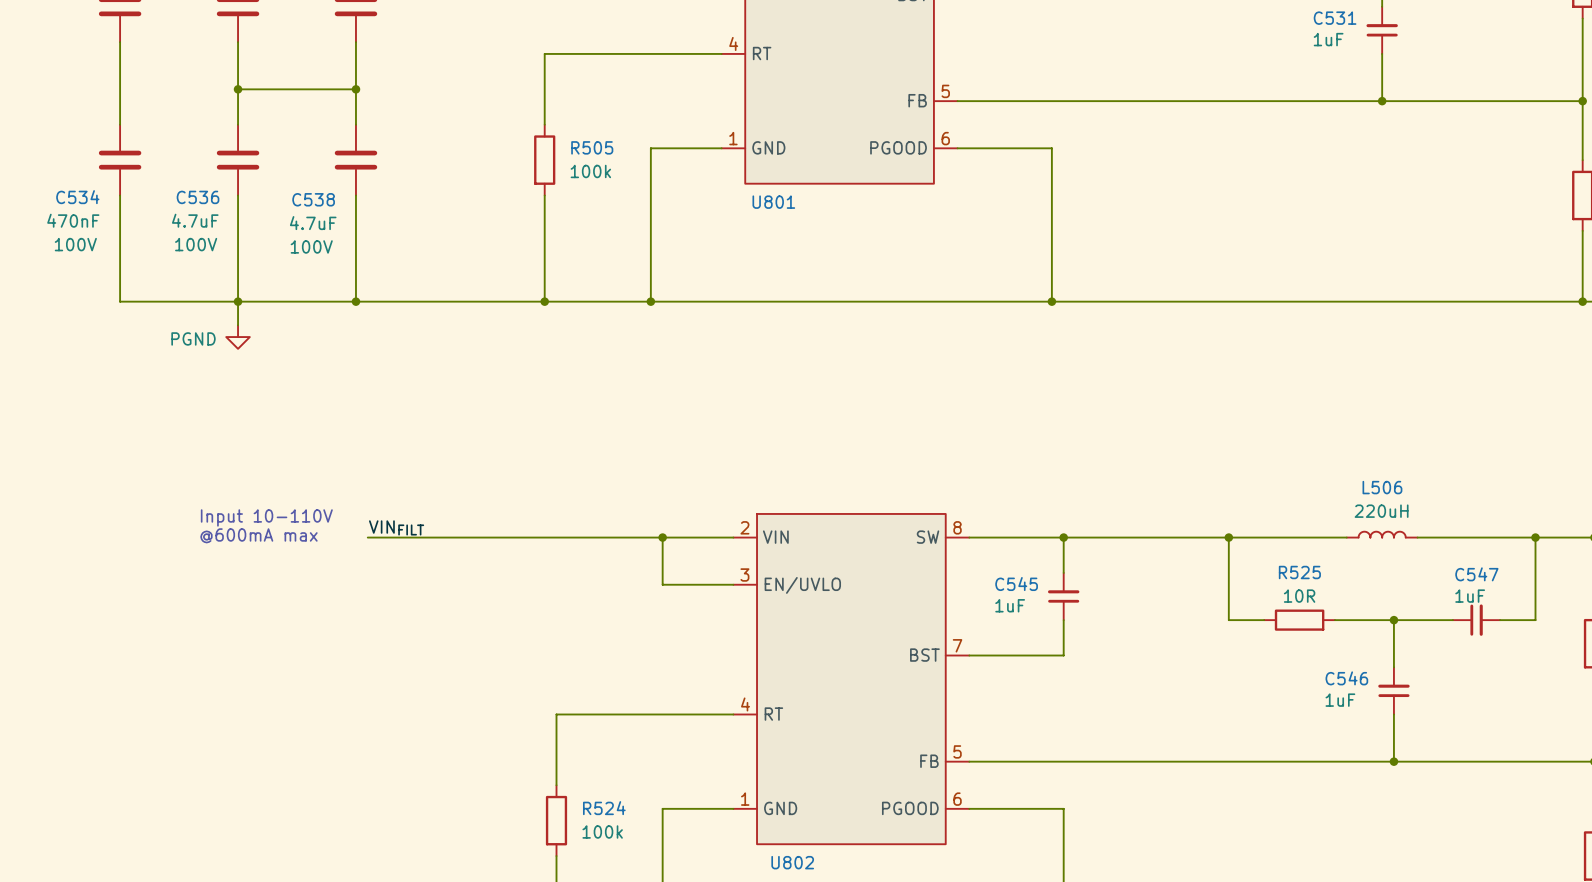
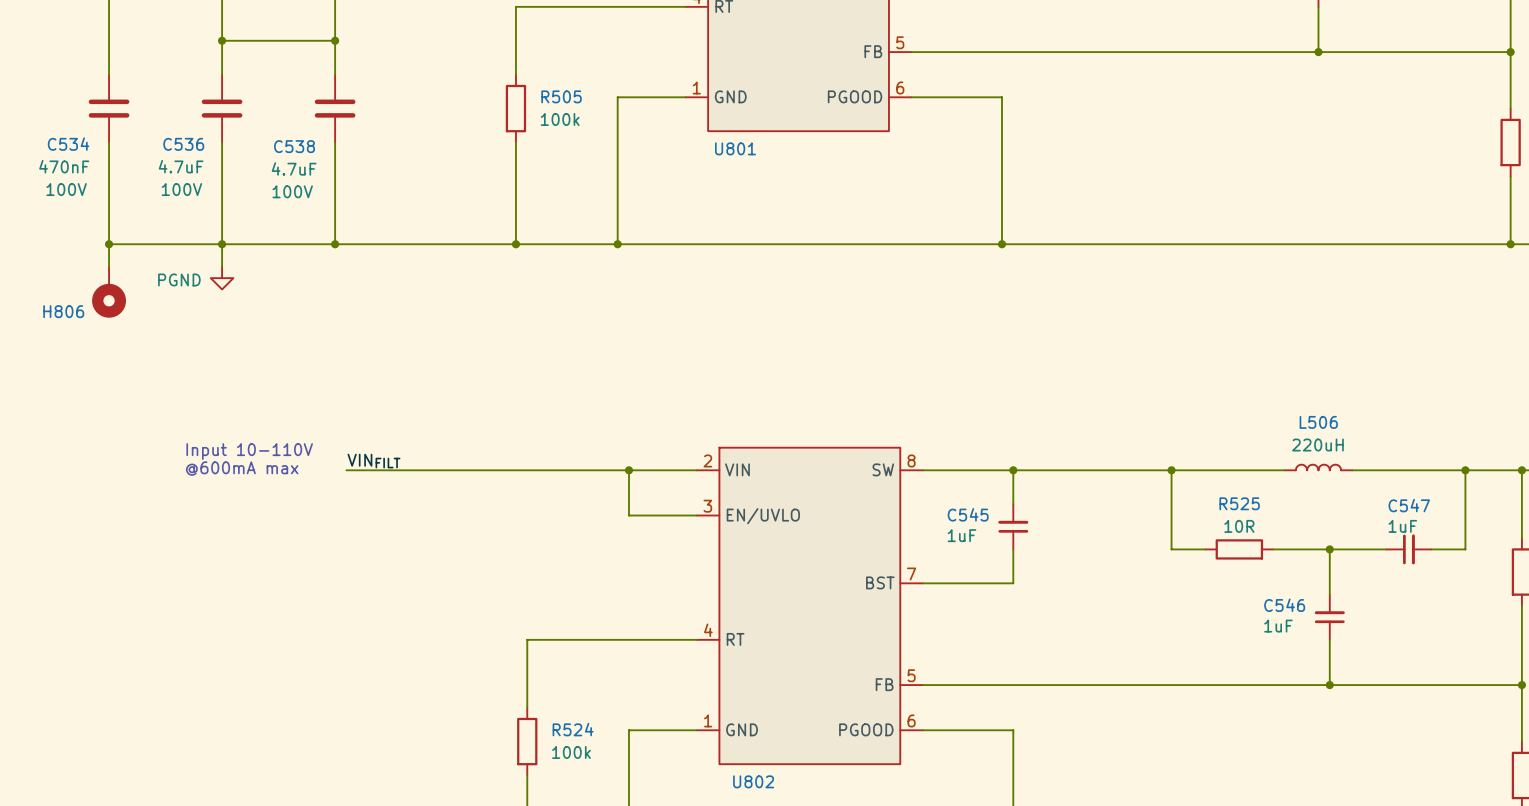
wire: none -> (109, 244) (109, 266)
junction: none -> (109, 244)
H806: none -> (109, 292)

